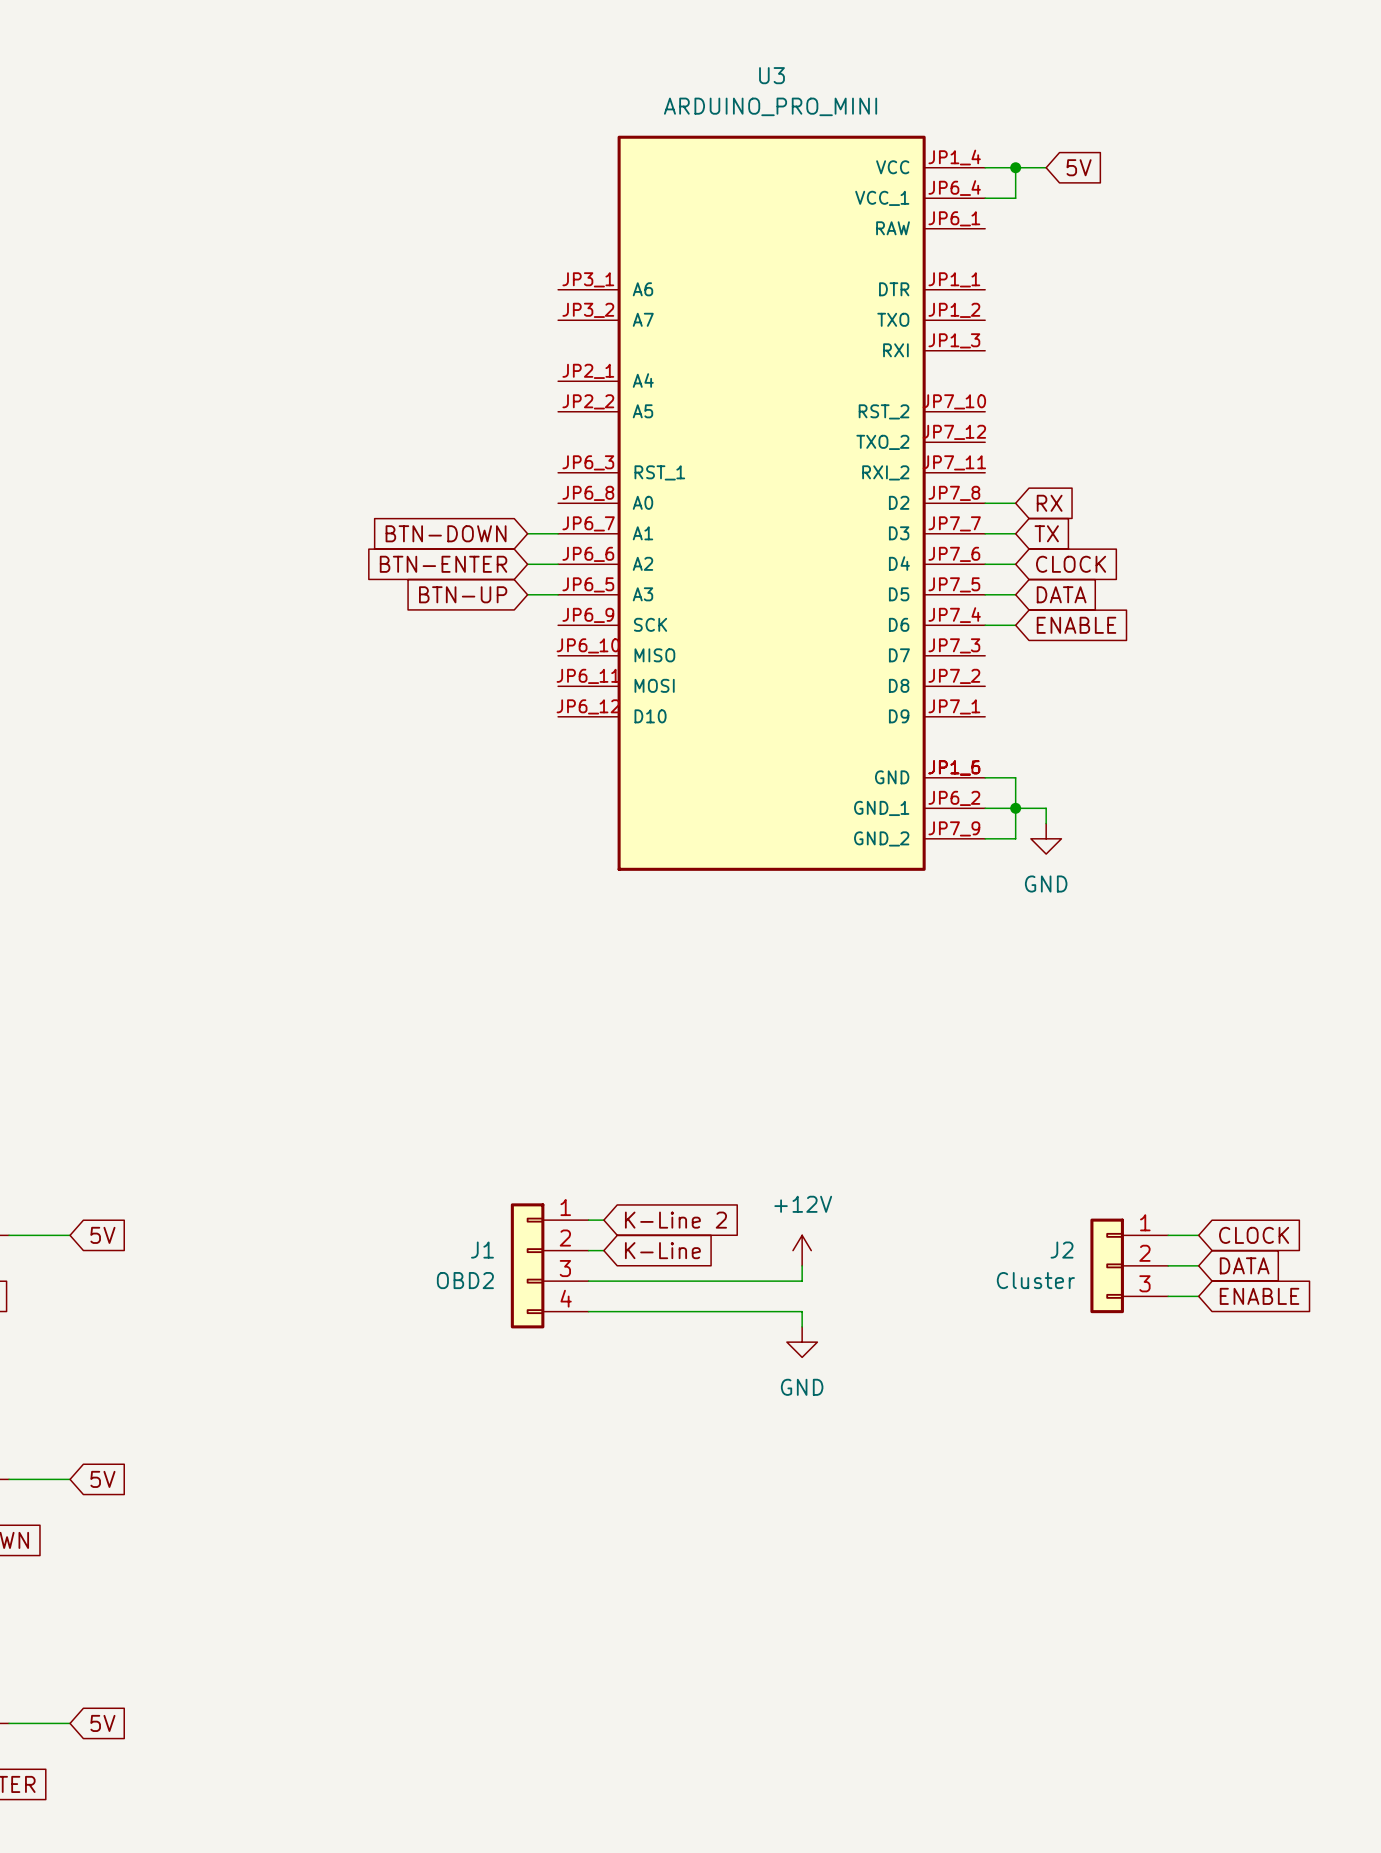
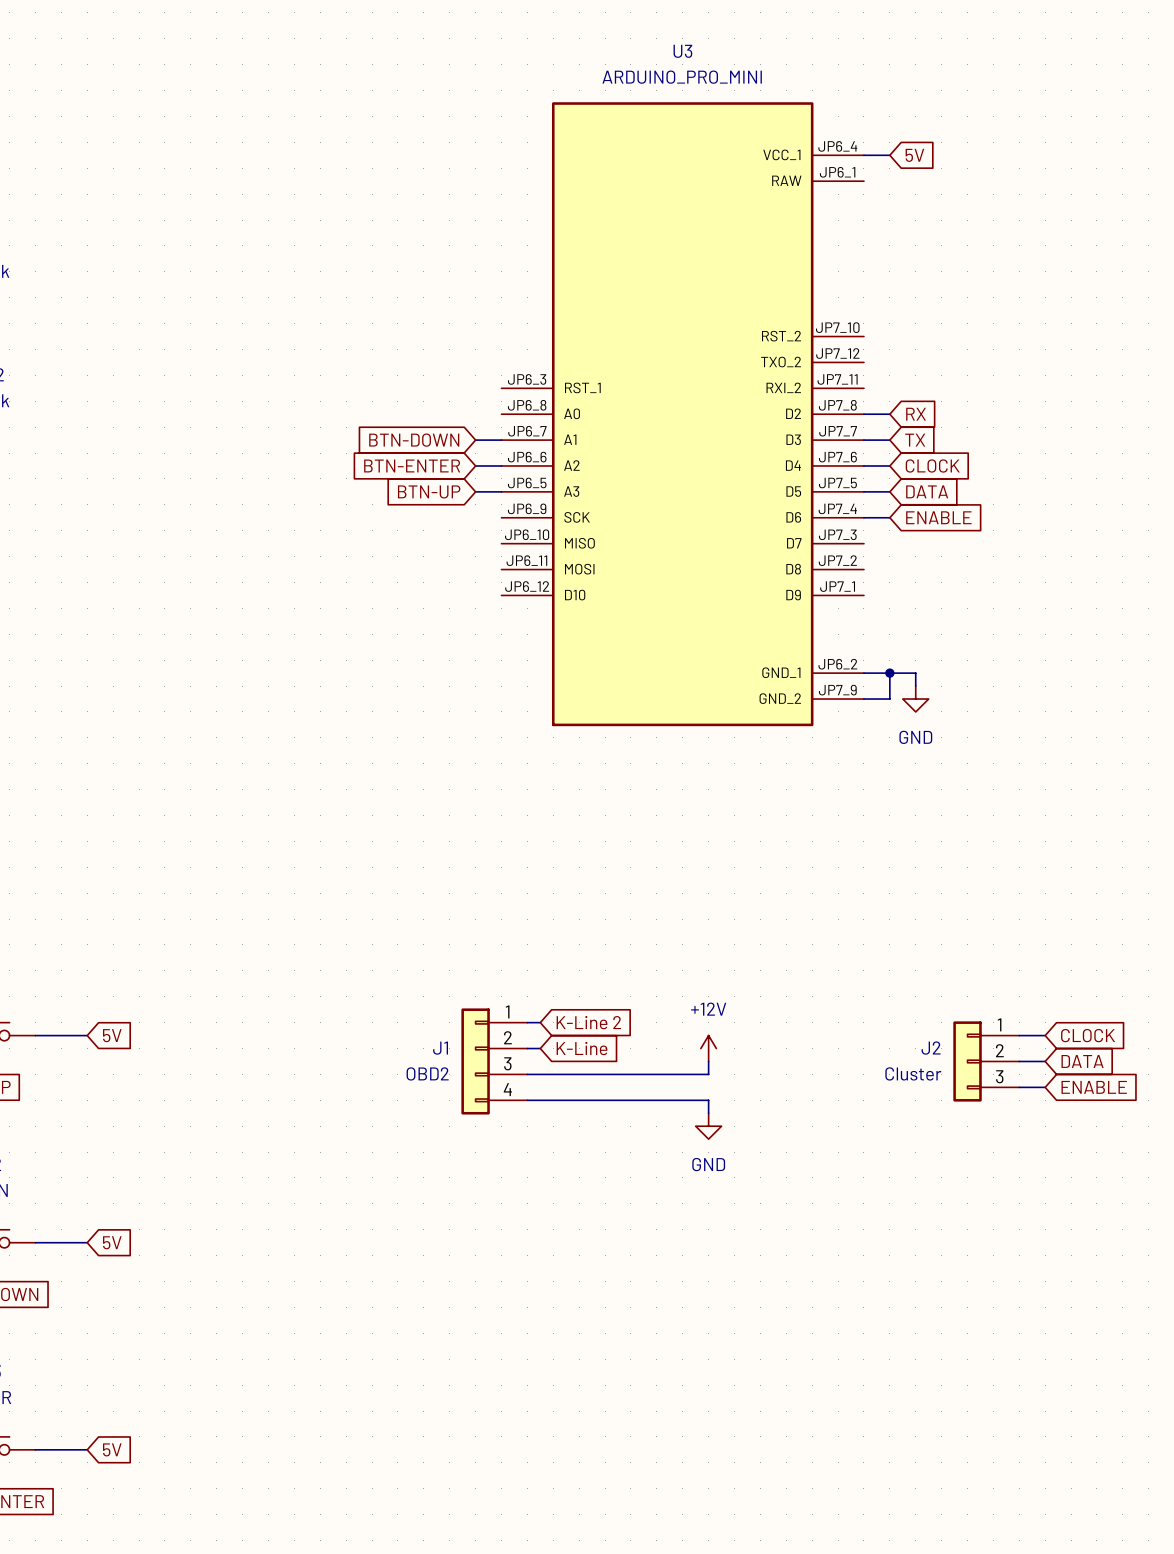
U3 symbol: [558, 135, 986, 871] -> [501, 102, 864, 727]
wire: (985, 167) (1046, 167) -> none
wire: (1015, 167) (1015, 198) -> none
junction: (1015, 167) -> none
global label position: 5V (1079, 167) -> 5V (914, 155)
wire: (985, 777) (1015, 777) (1015, 808) -> none

